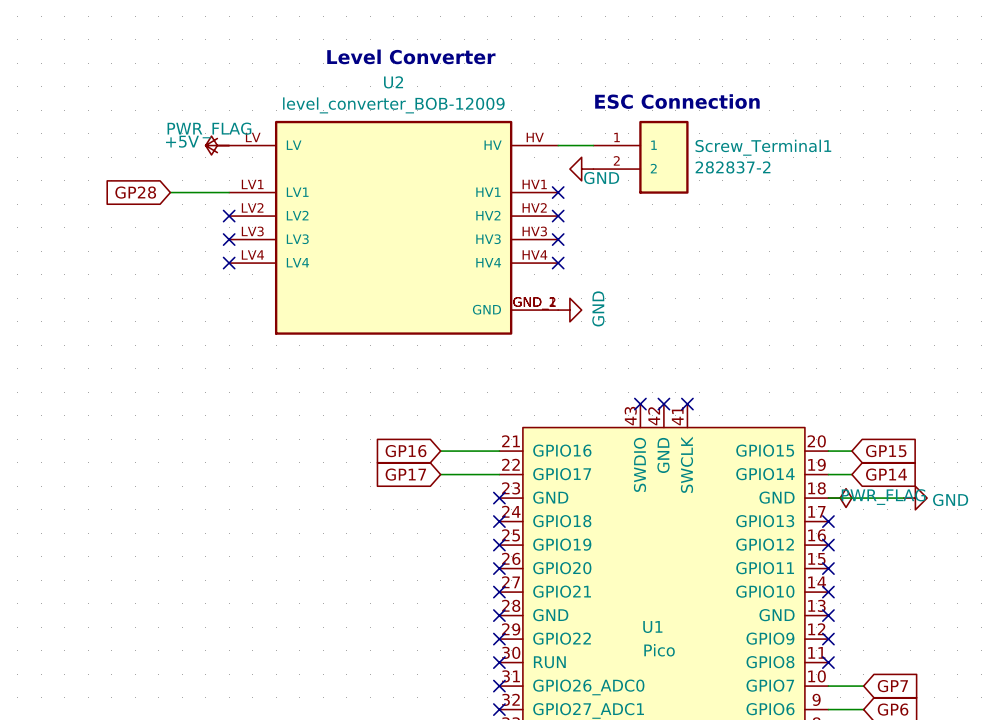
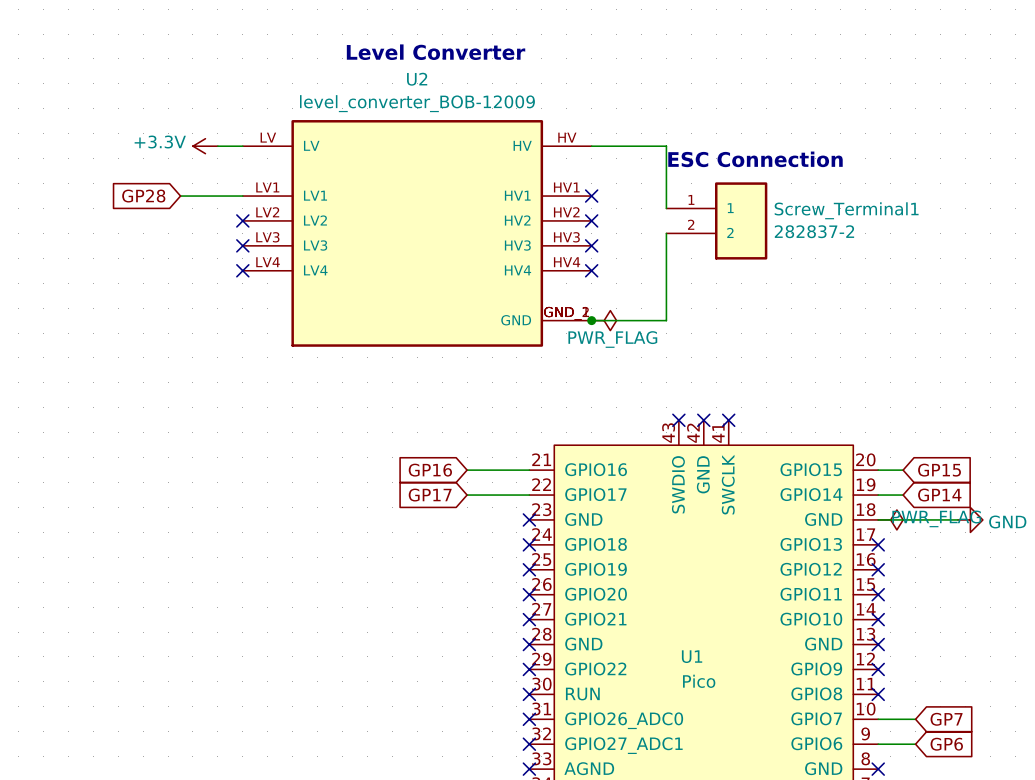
text position: ESC Connection (677, 101) -> ESC Connection (755, 159)
power symbol: none -> +3.3V (205, 146)
power symbol: +5V (217, 145) -> none
power symbol: PWR_FLAG (217, 145) -> none
wire: none -> (629, 146) (666, 146) (666, 208)
Screw_Terminal1 position: (641, 157) -> (716, 220)
power symbol: GND (581, 169) -> none
wire: none -> (666, 233) (666, 320) (591, 320)
junction: none -> (591, 320)
power symbol: GND (569, 310) -> PWR_FLAG (604, 320)

